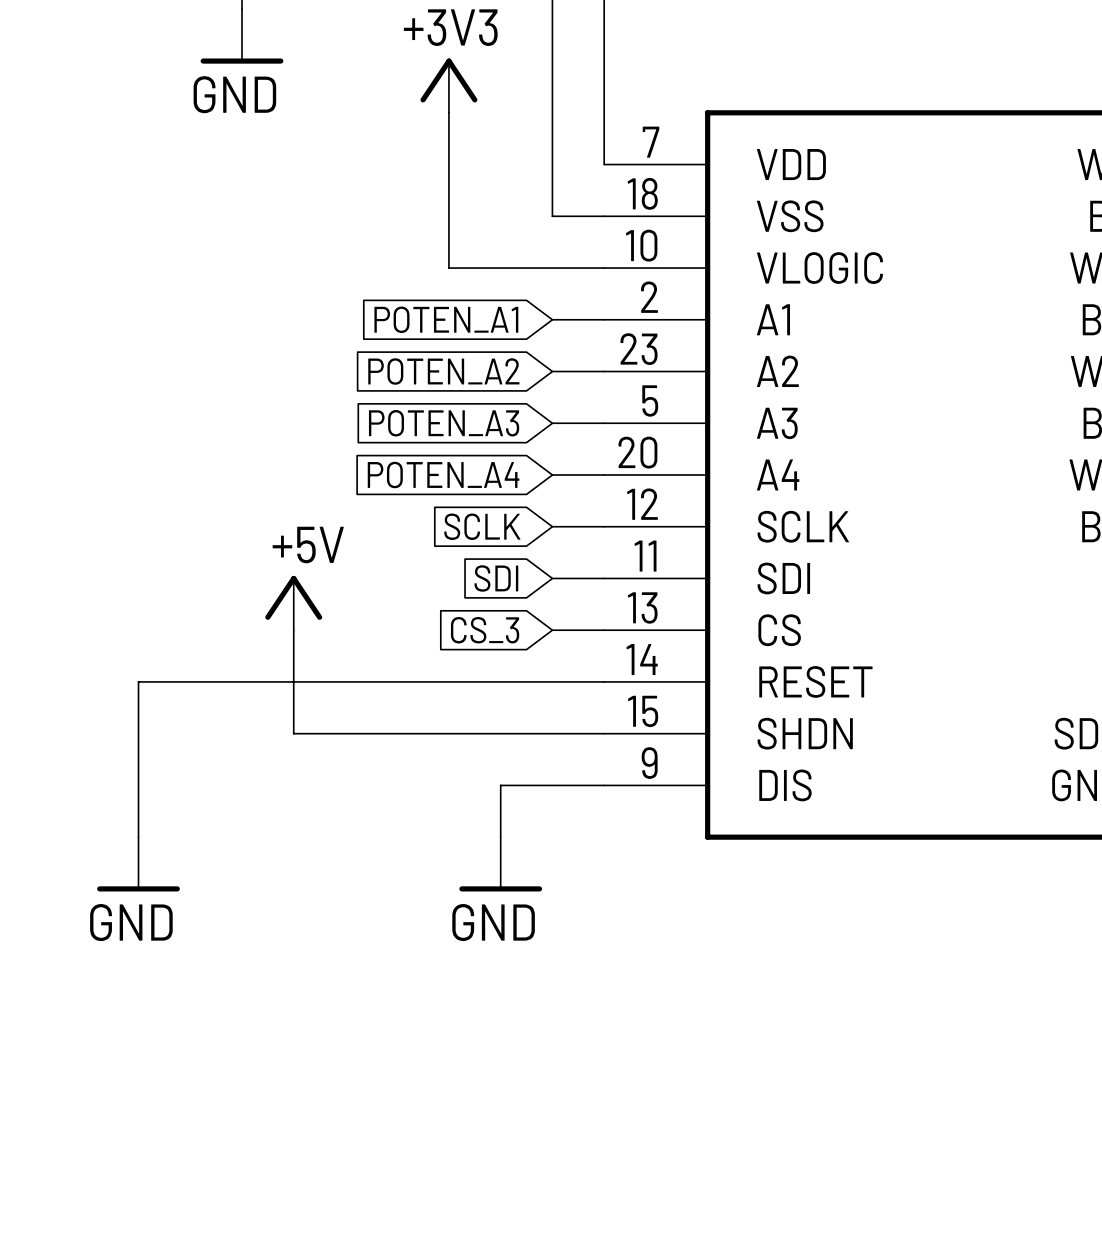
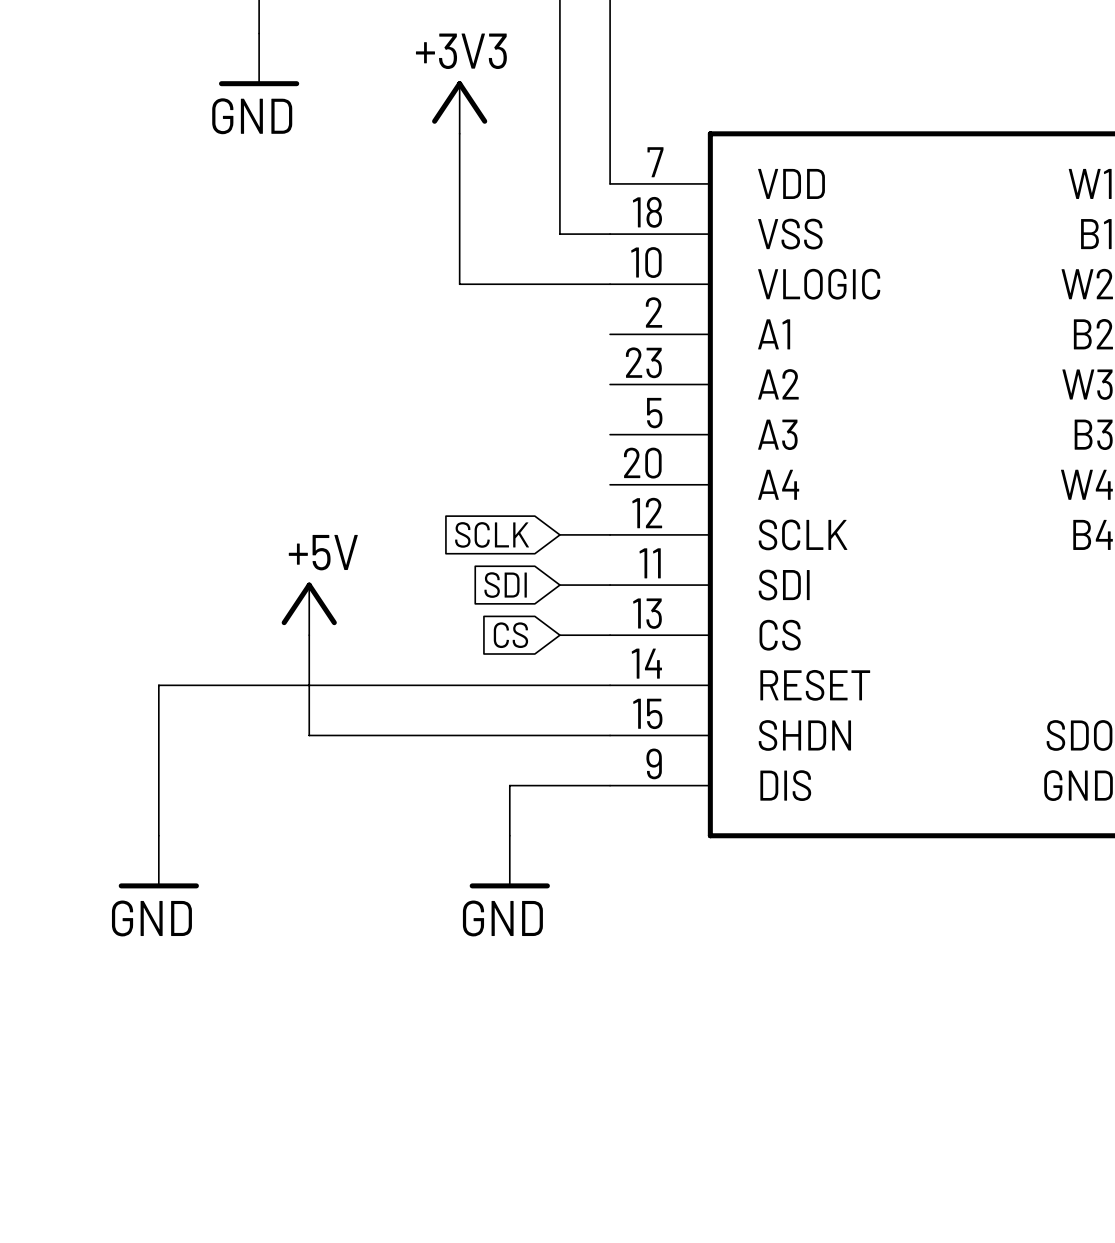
global label: POTEN_A1 (446, 319) -> none
wire: (552, 319) (604, 319) -> none
global label: POTEN_A2 (443, 371) -> none
wire: (552, 371) (604, 371) -> none
global label: POTEN_A3 (444, 423) -> none
wire: (552, 423) (604, 423) -> none
global label: POTEN_A4 (443, 474) -> none
wire: (552, 474) (604, 474) -> none
global label: CS_3 (485, 630) -> CS (510, 635)

